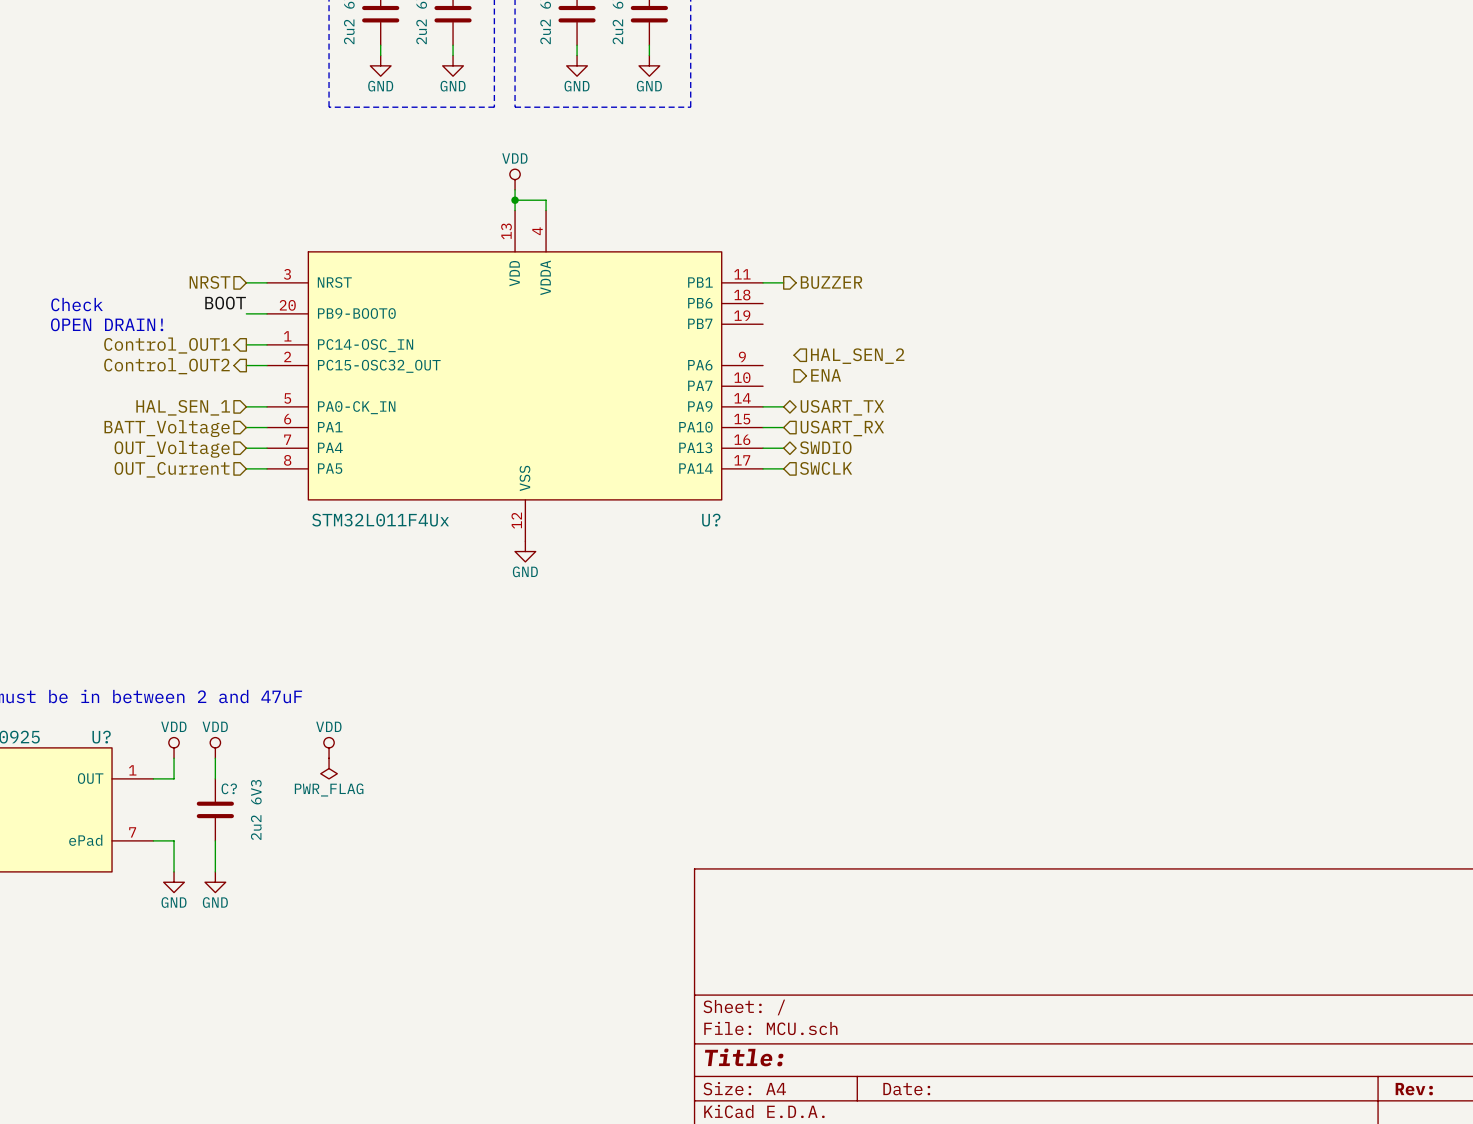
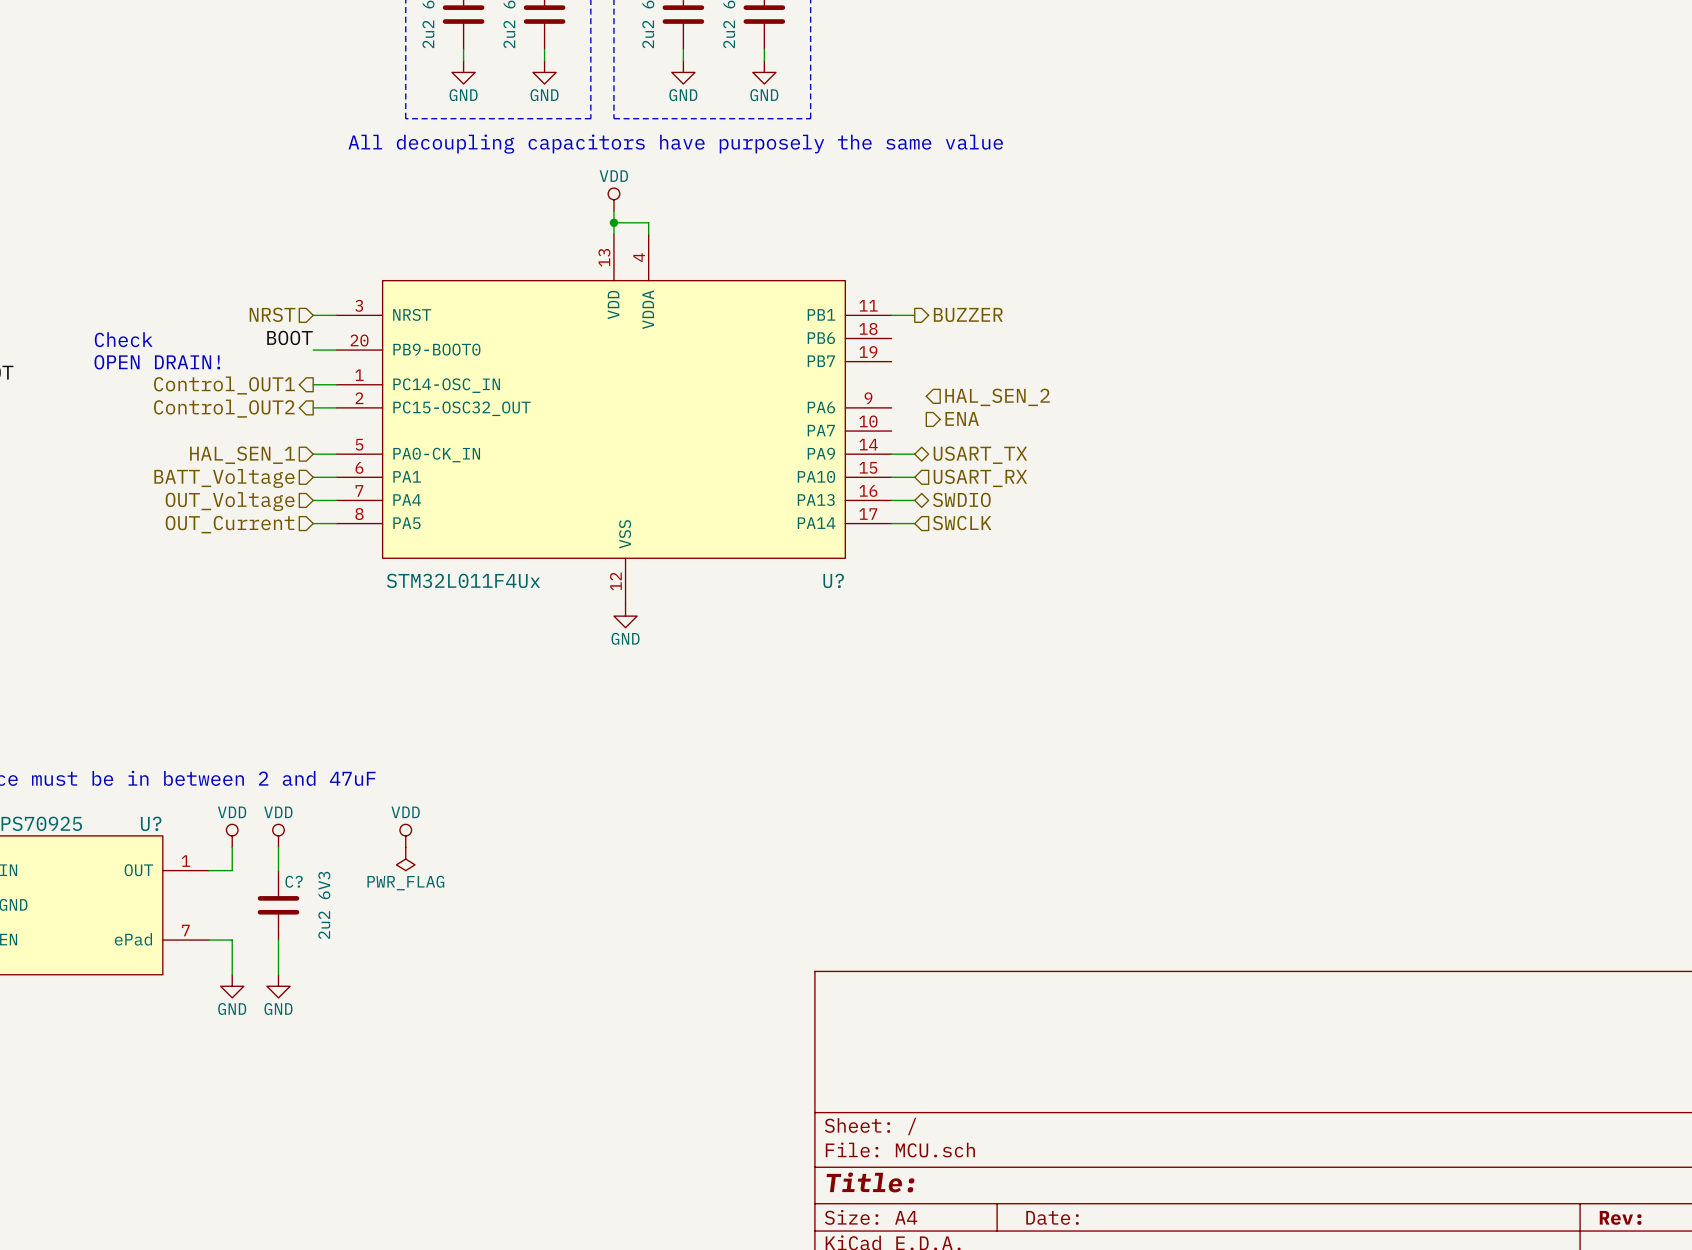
text: none -> All decoupling capacitors have purposely the same value (675, 144)

